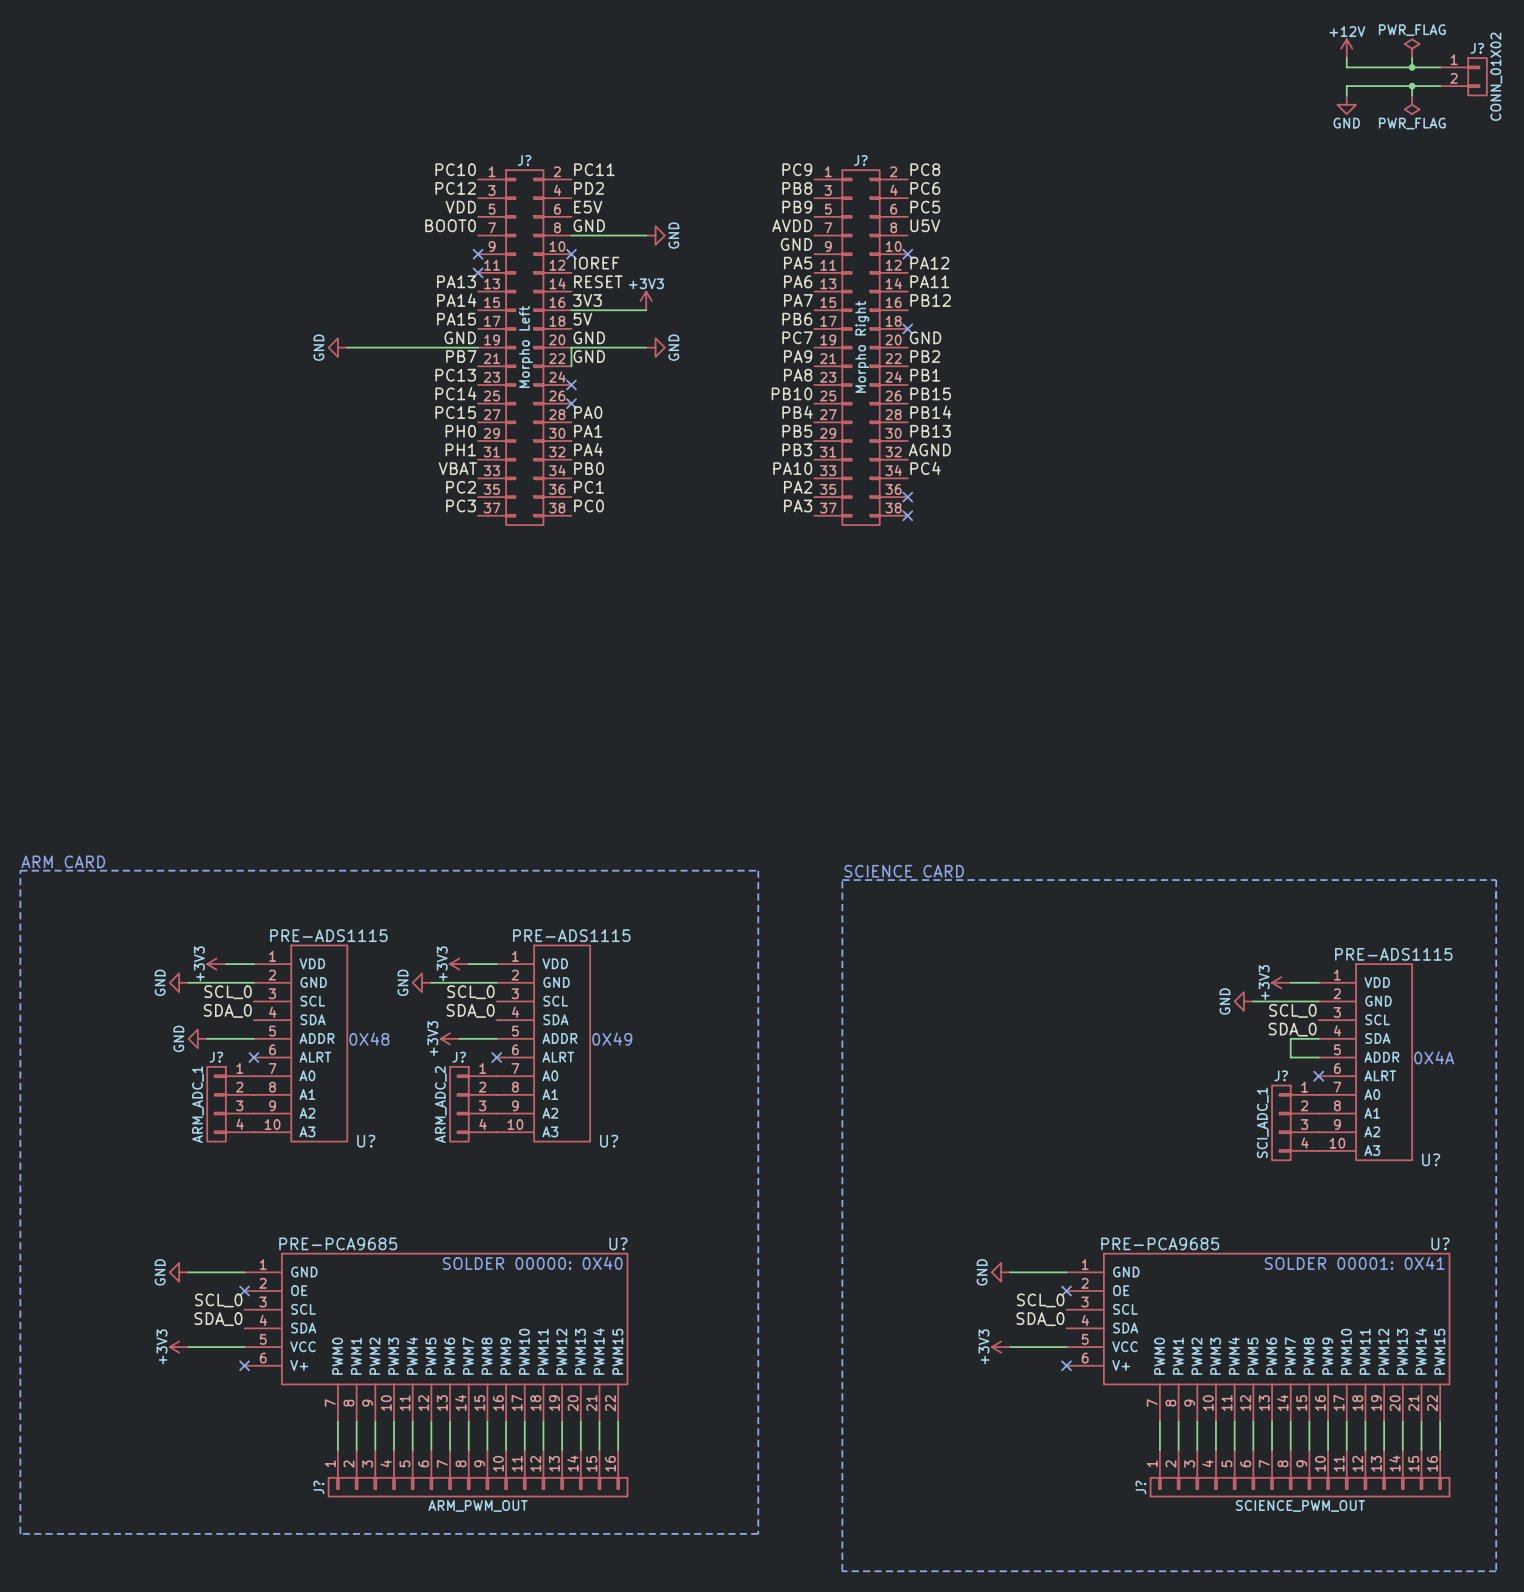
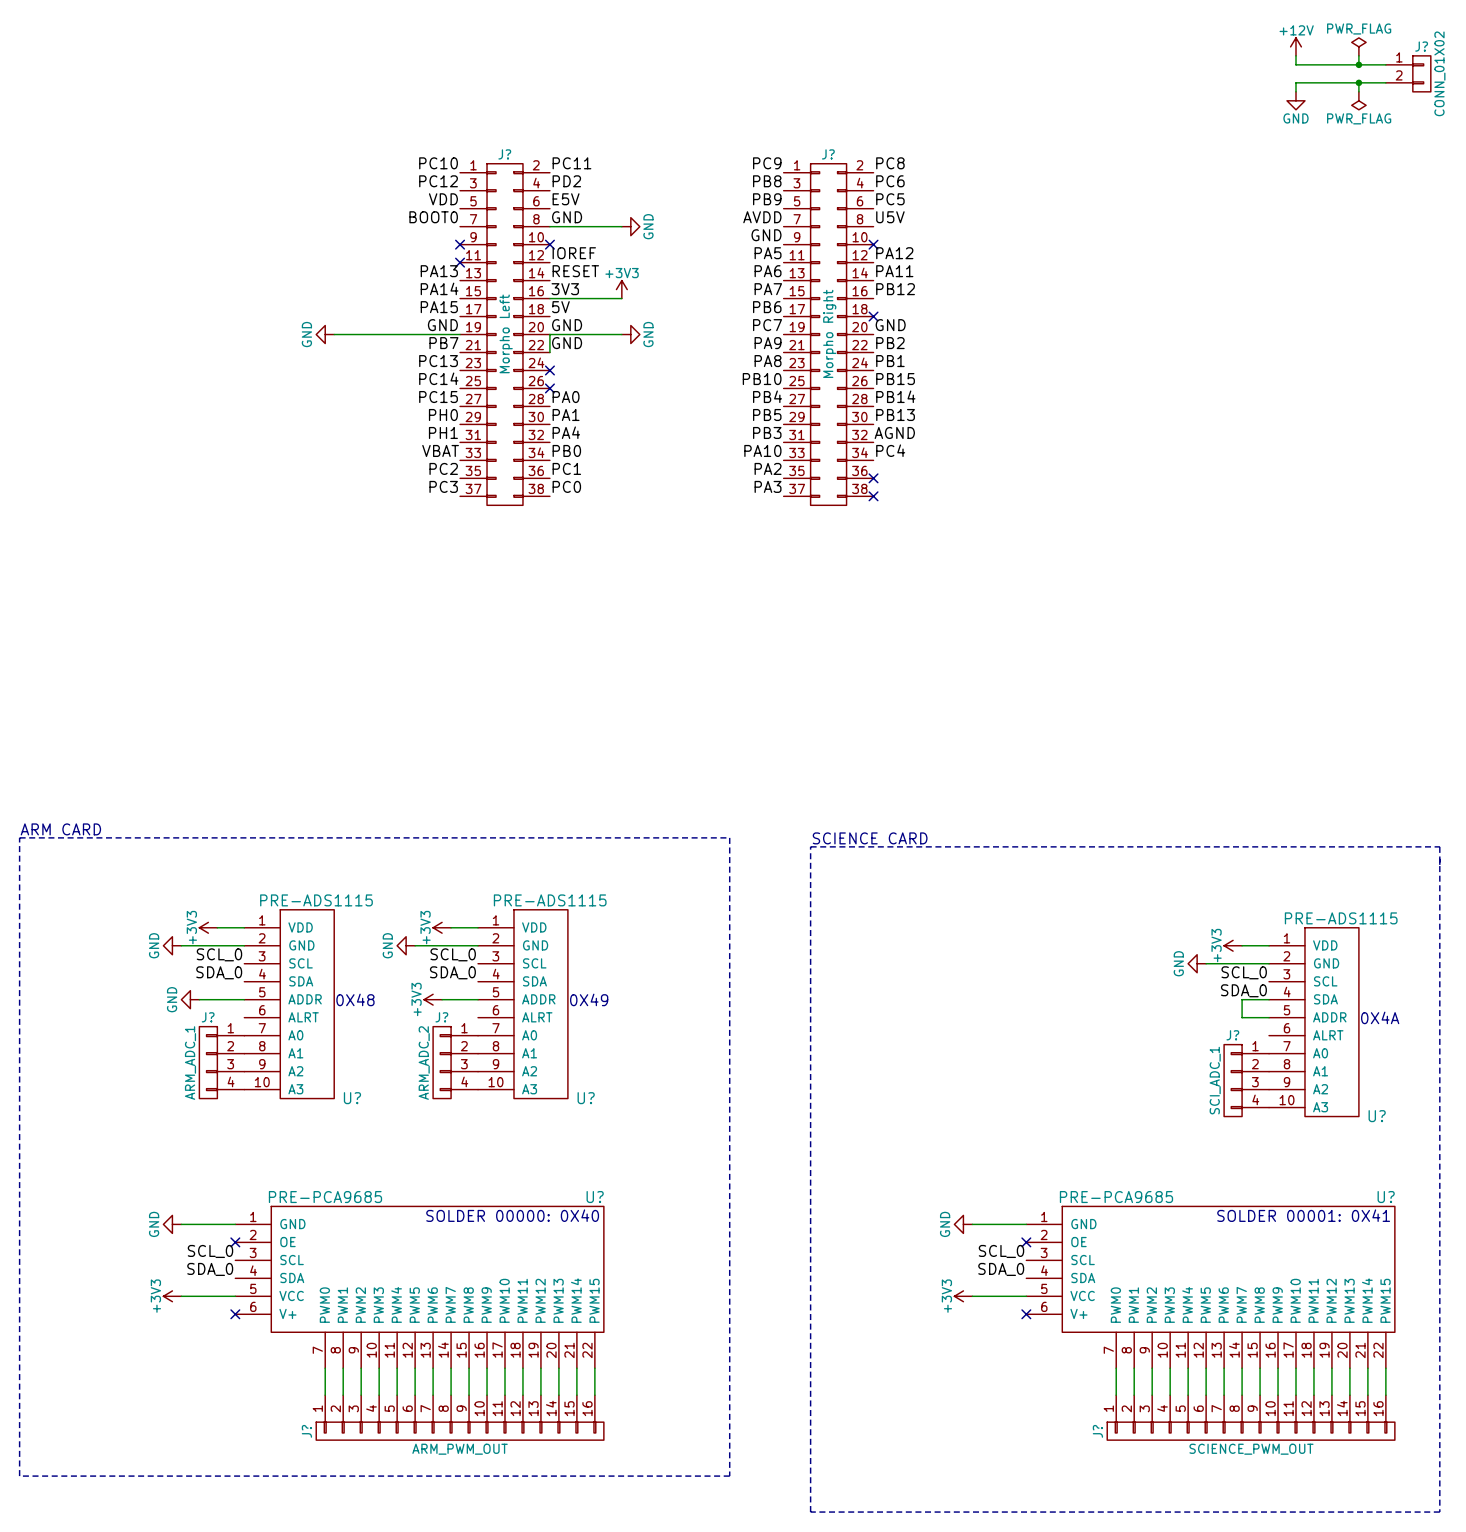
no-connect mark: (253, 1057) -> none
no-connect mark: (496, 1057) -> none
no-connect mark: (1318, 1076) -> none

